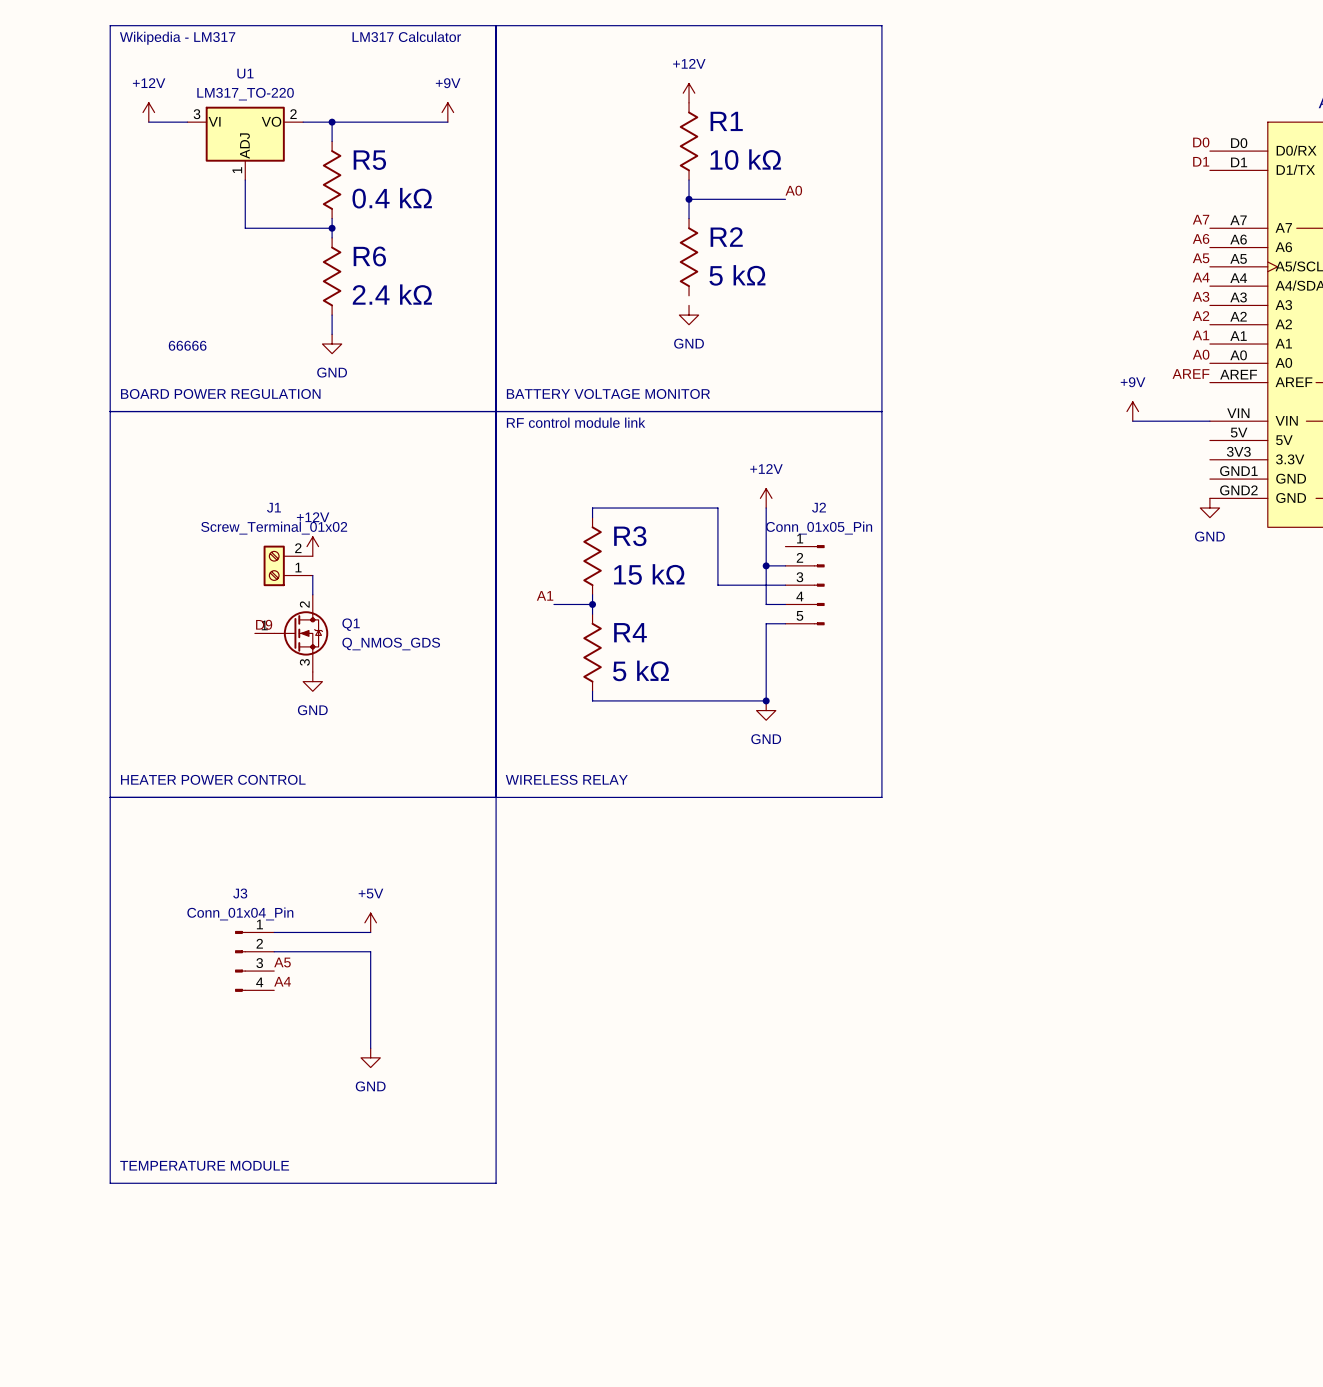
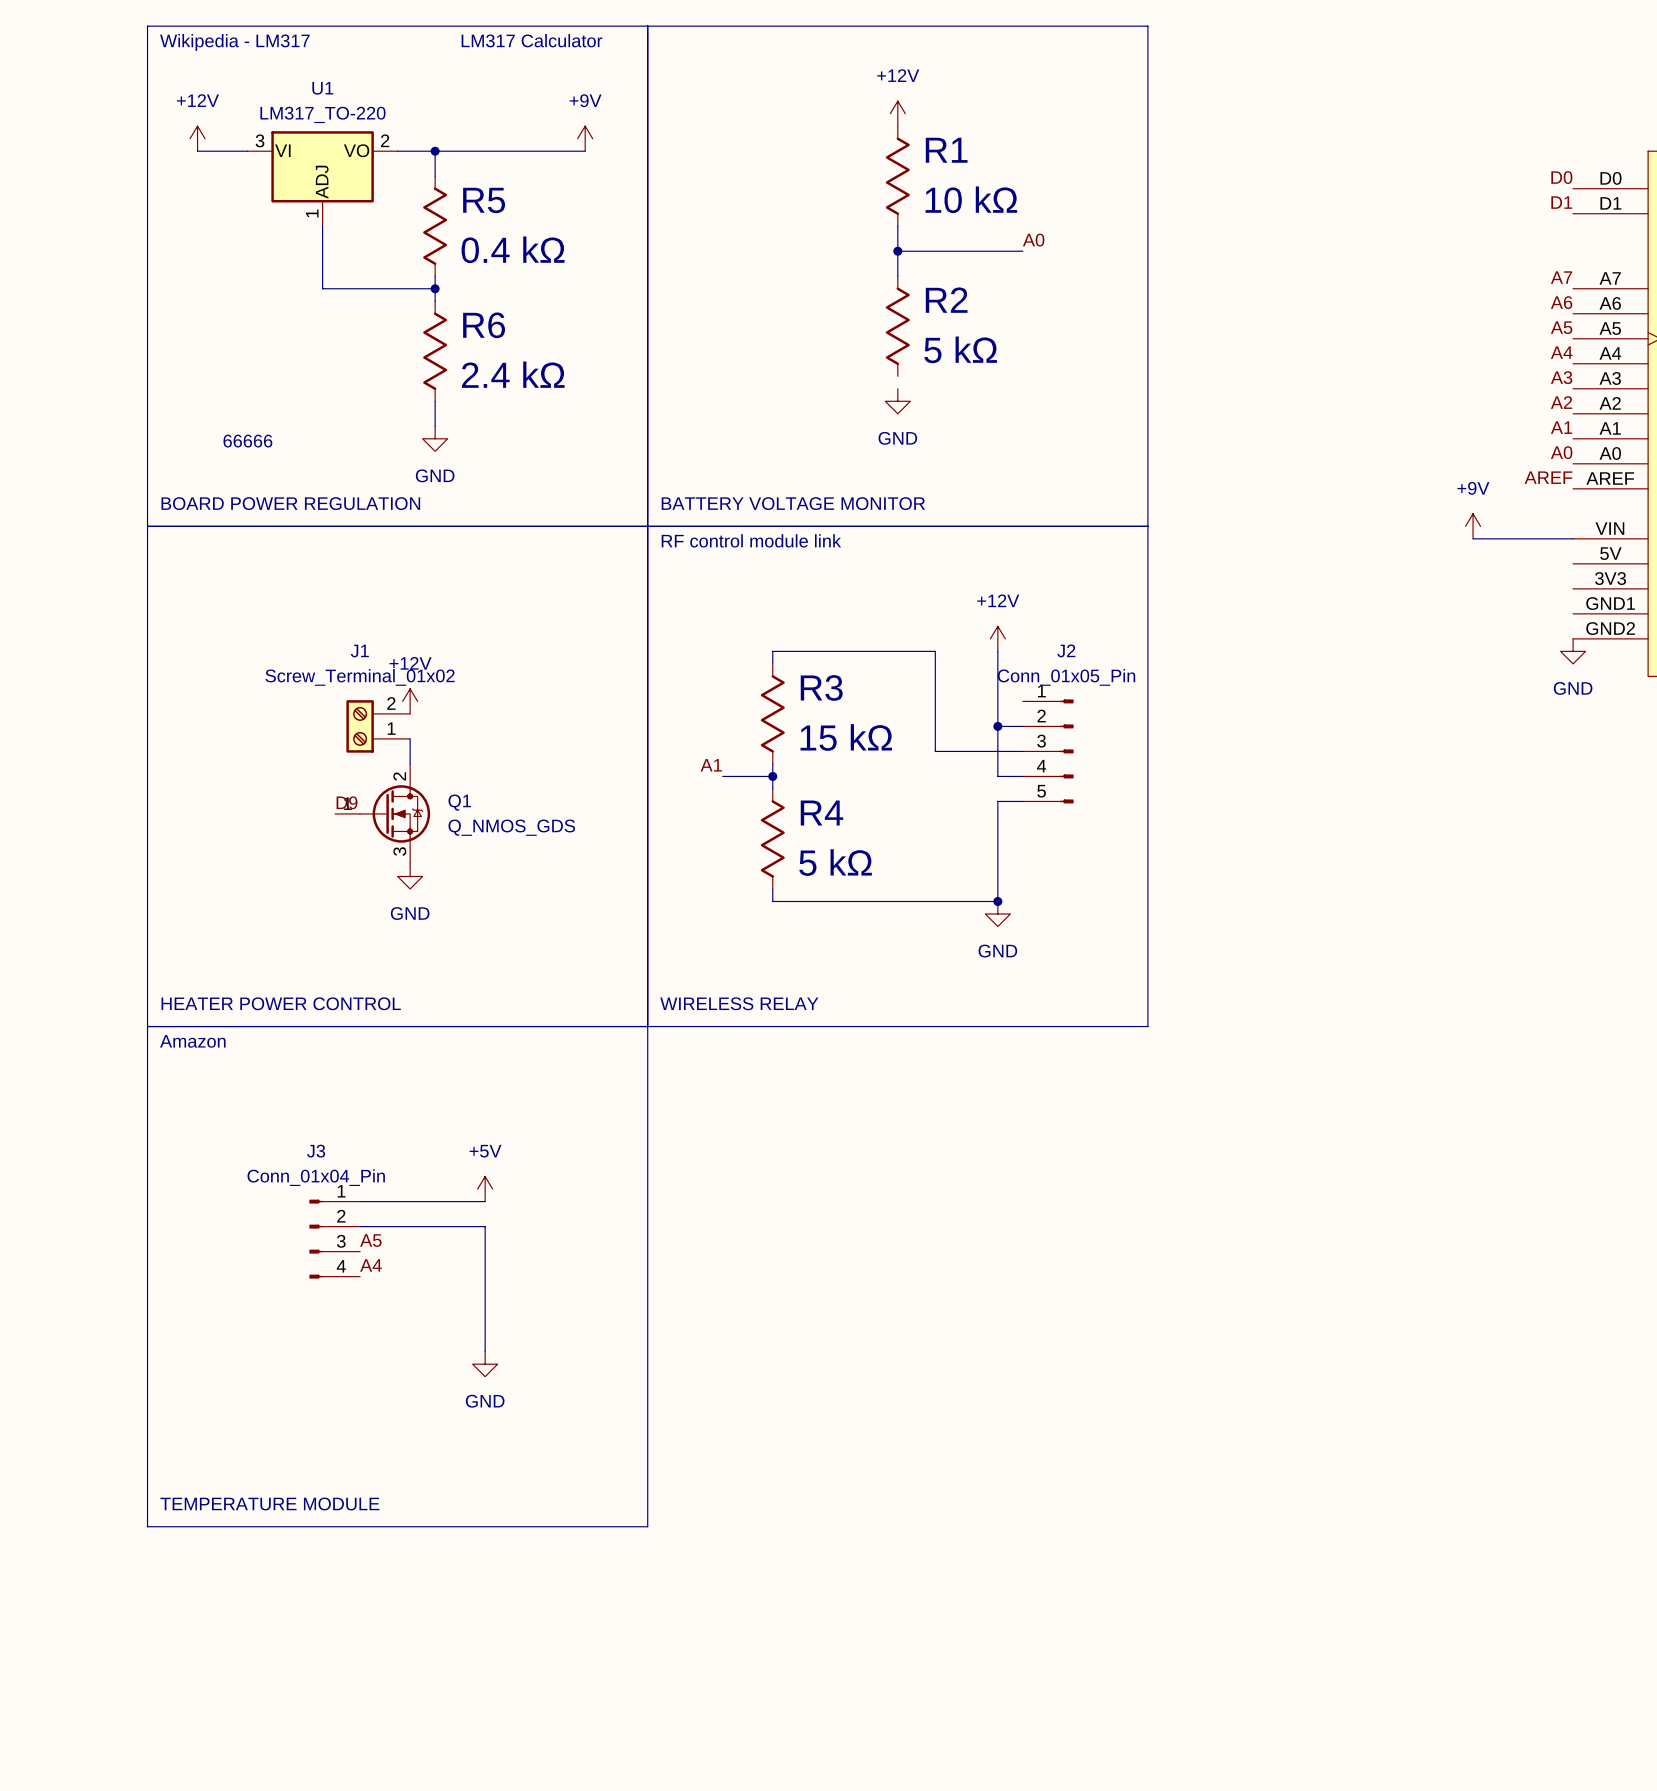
text: none -> Amazon (192, 1041)

